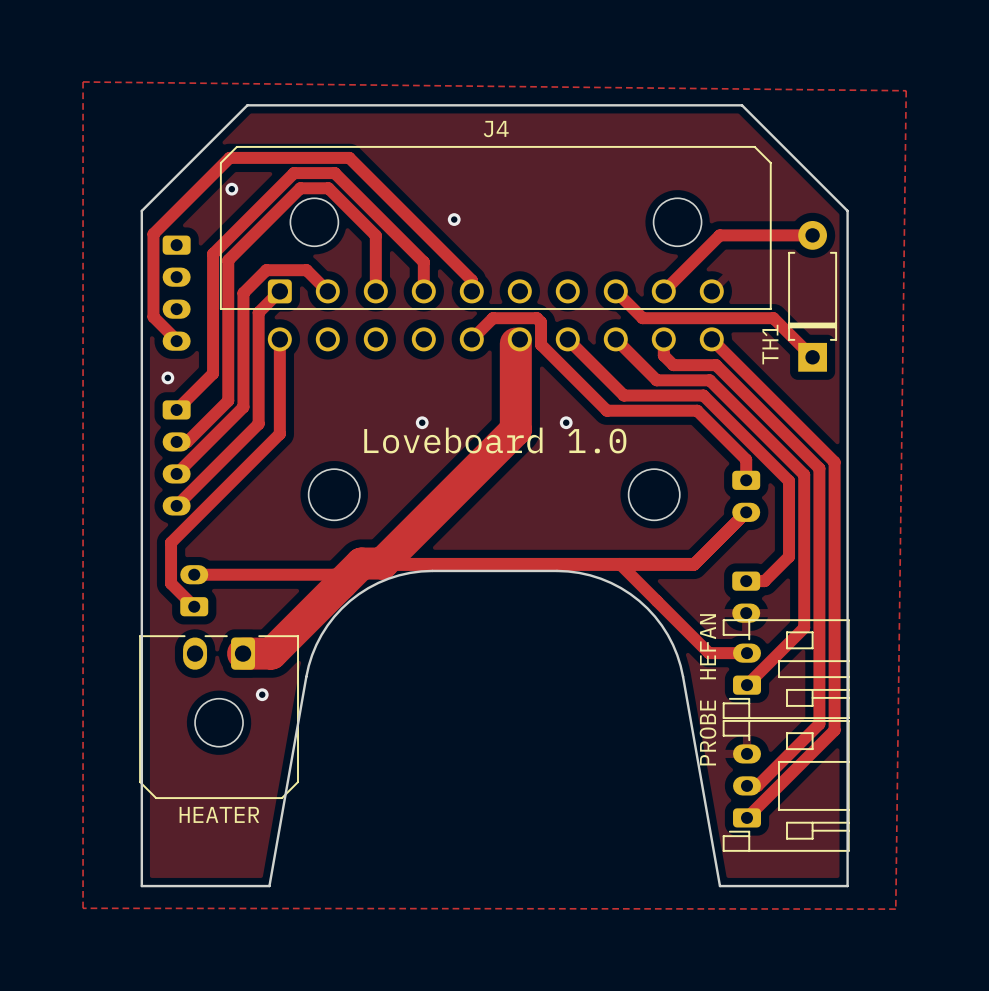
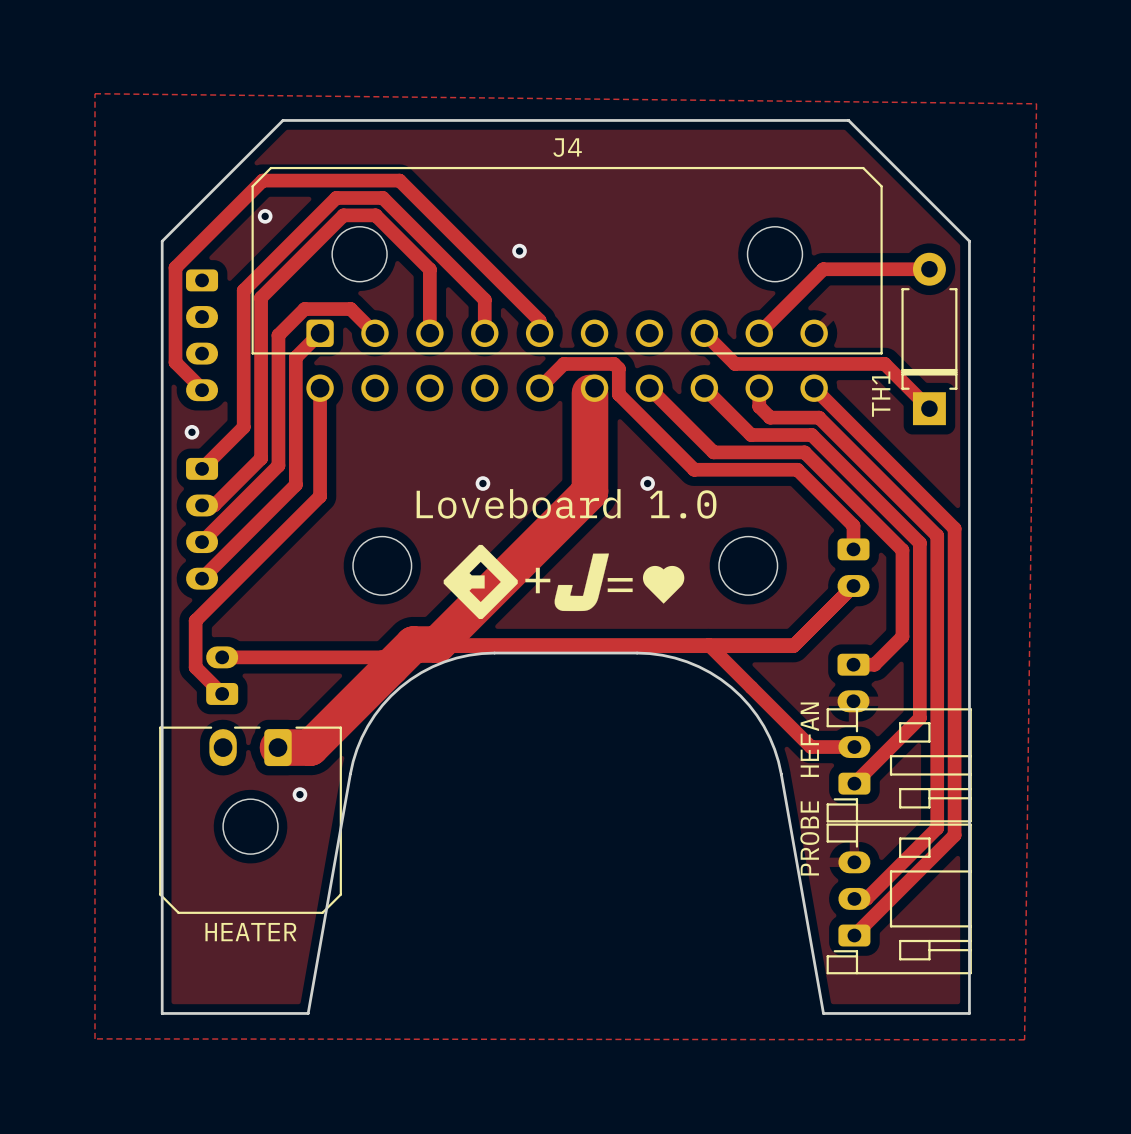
drawing: none -> [443, 544, 518, 619]
drawing: none -> [554, 553, 609, 612]
drawing: none -> [642, 565, 685, 604]
text: none -> + (537, 580)
text: none -> = (620, 585)

